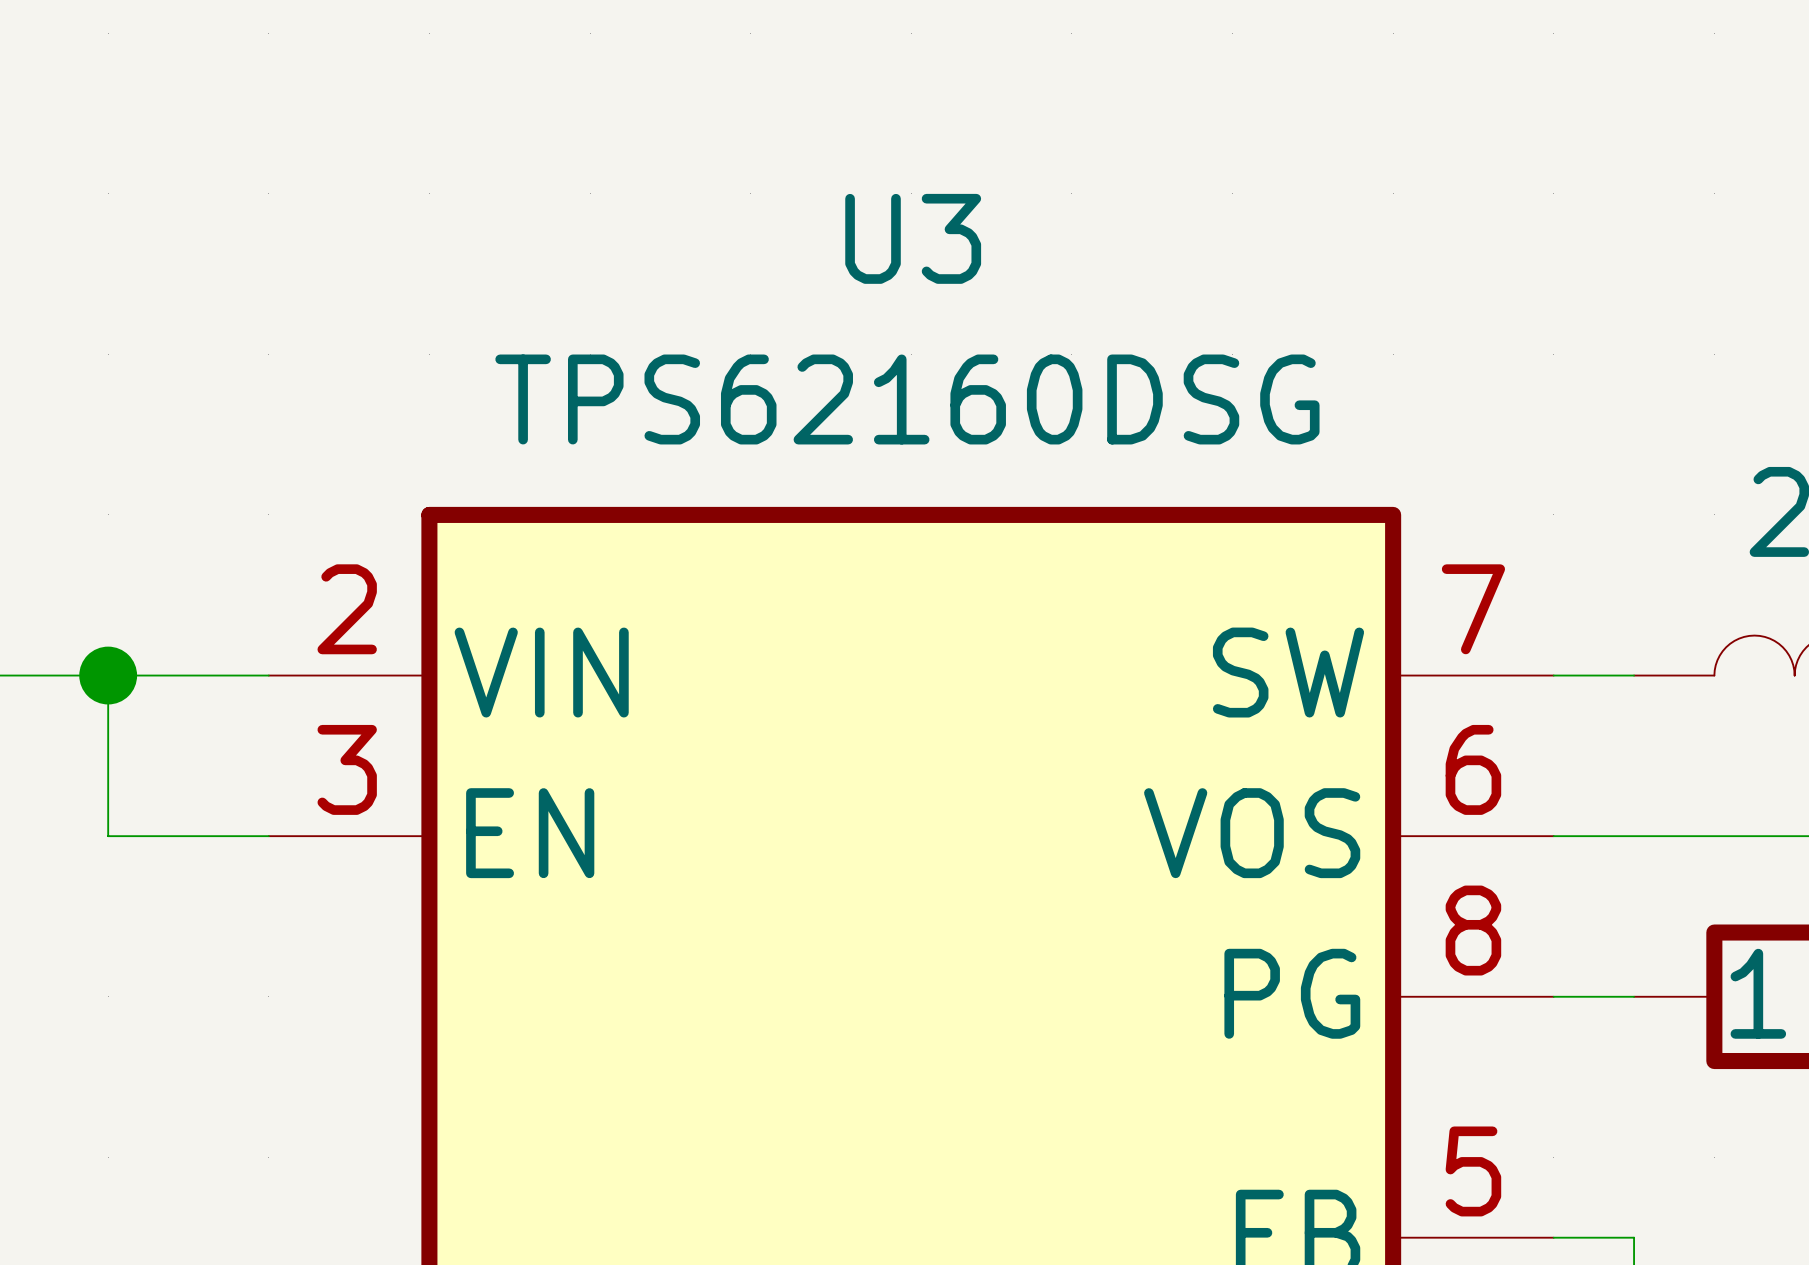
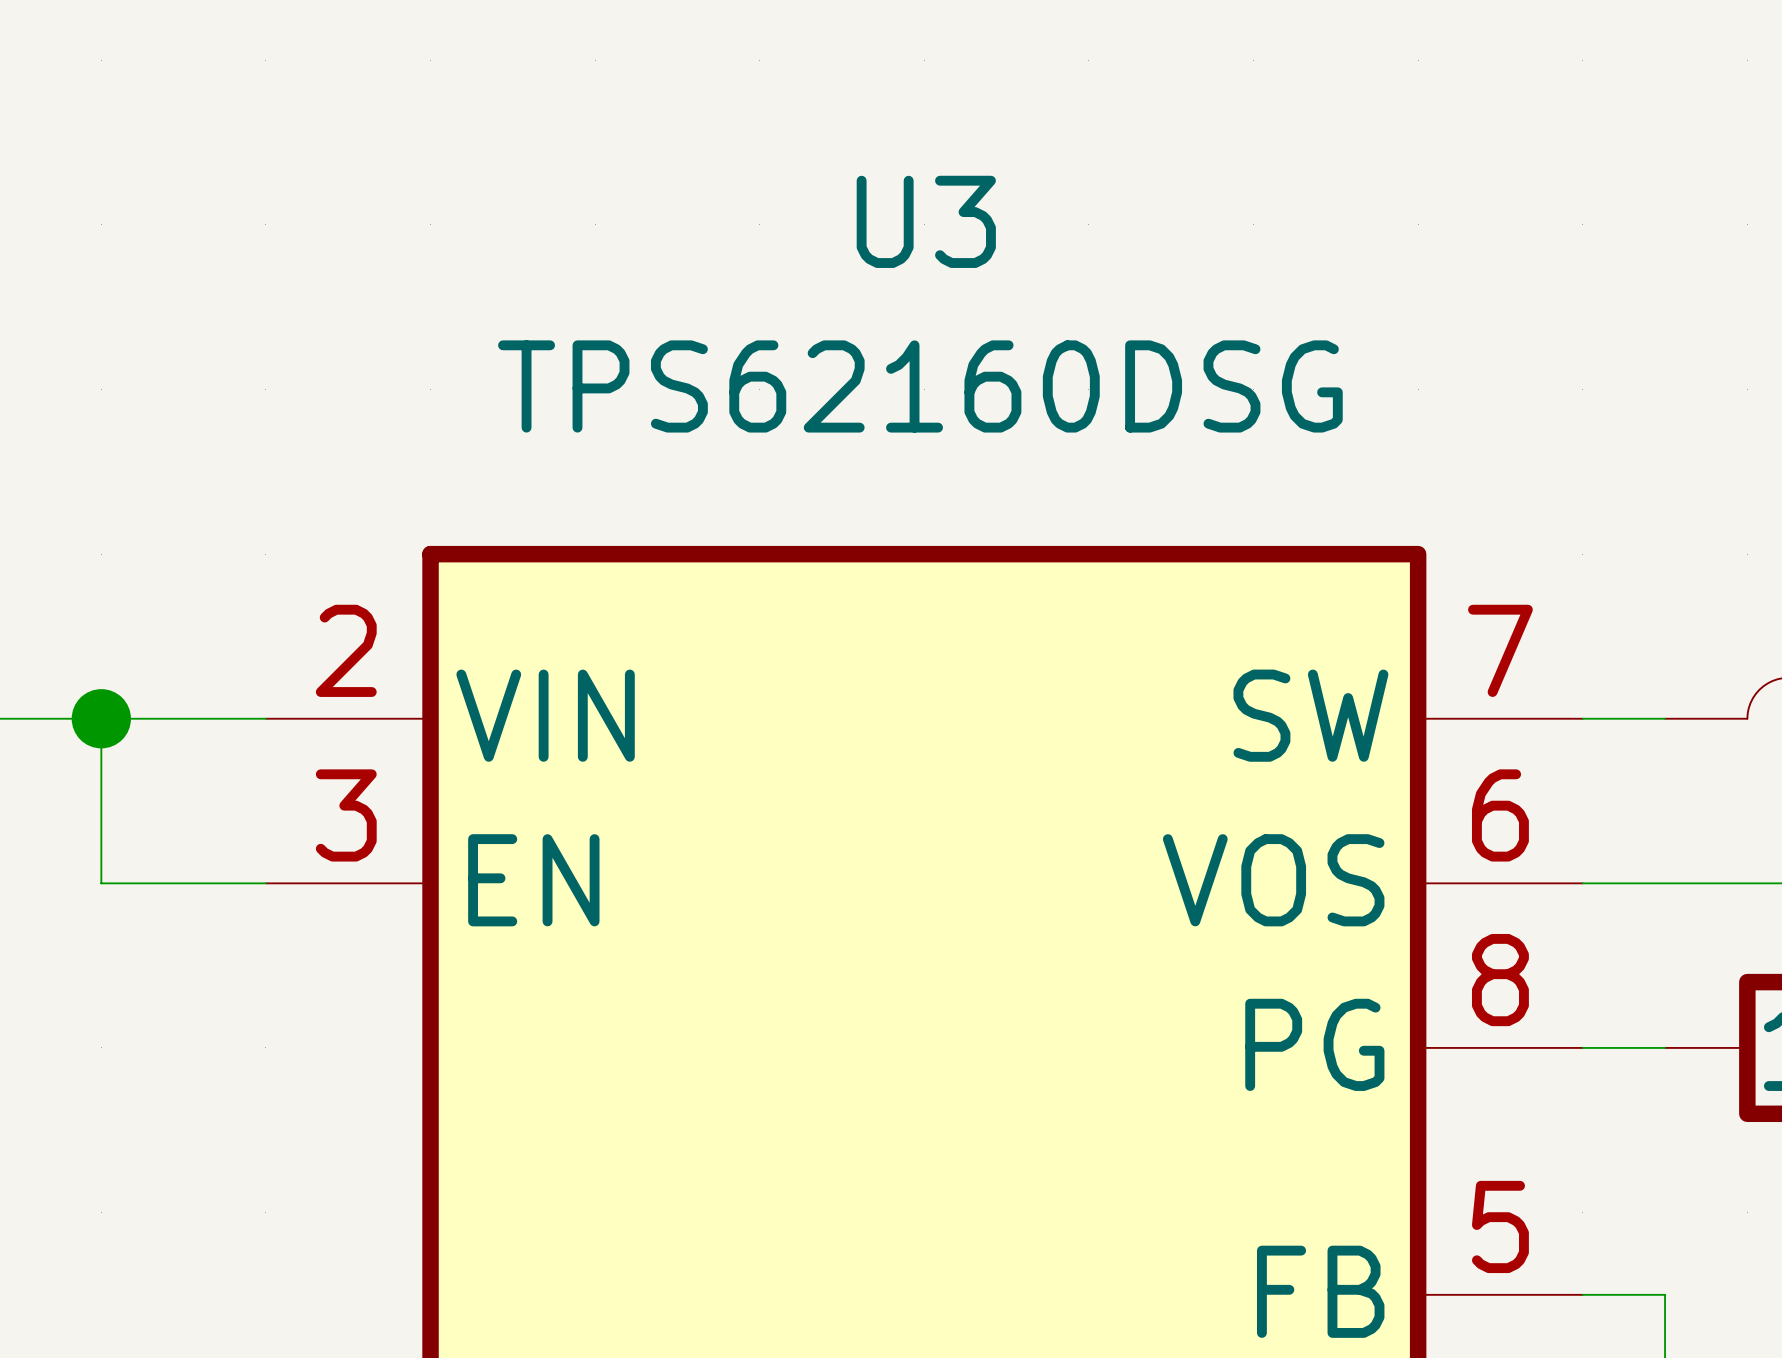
U3 name position: U3 (913, 238) -> U3 (926, 221)
U3 value position: TPS62160DSG (907, 399) -> TPS62160DSG (920, 386)

